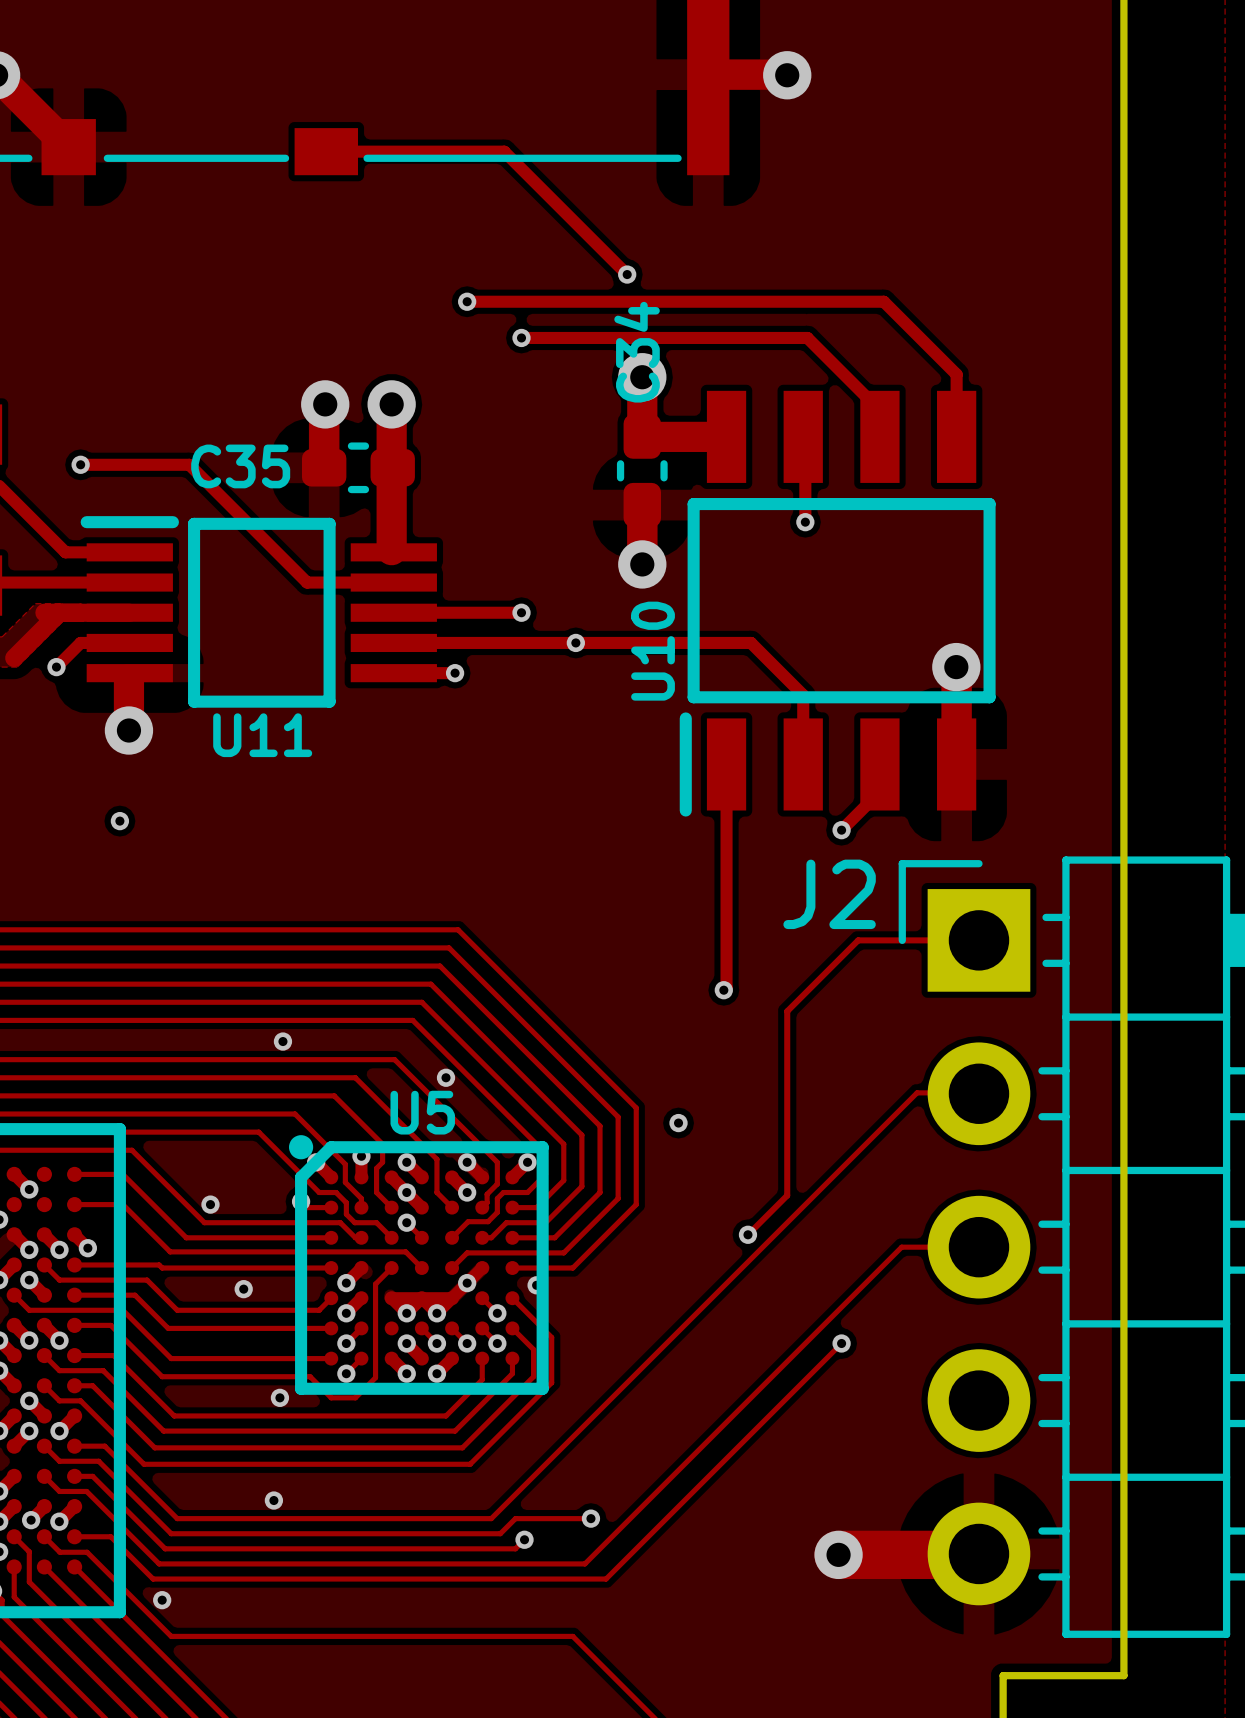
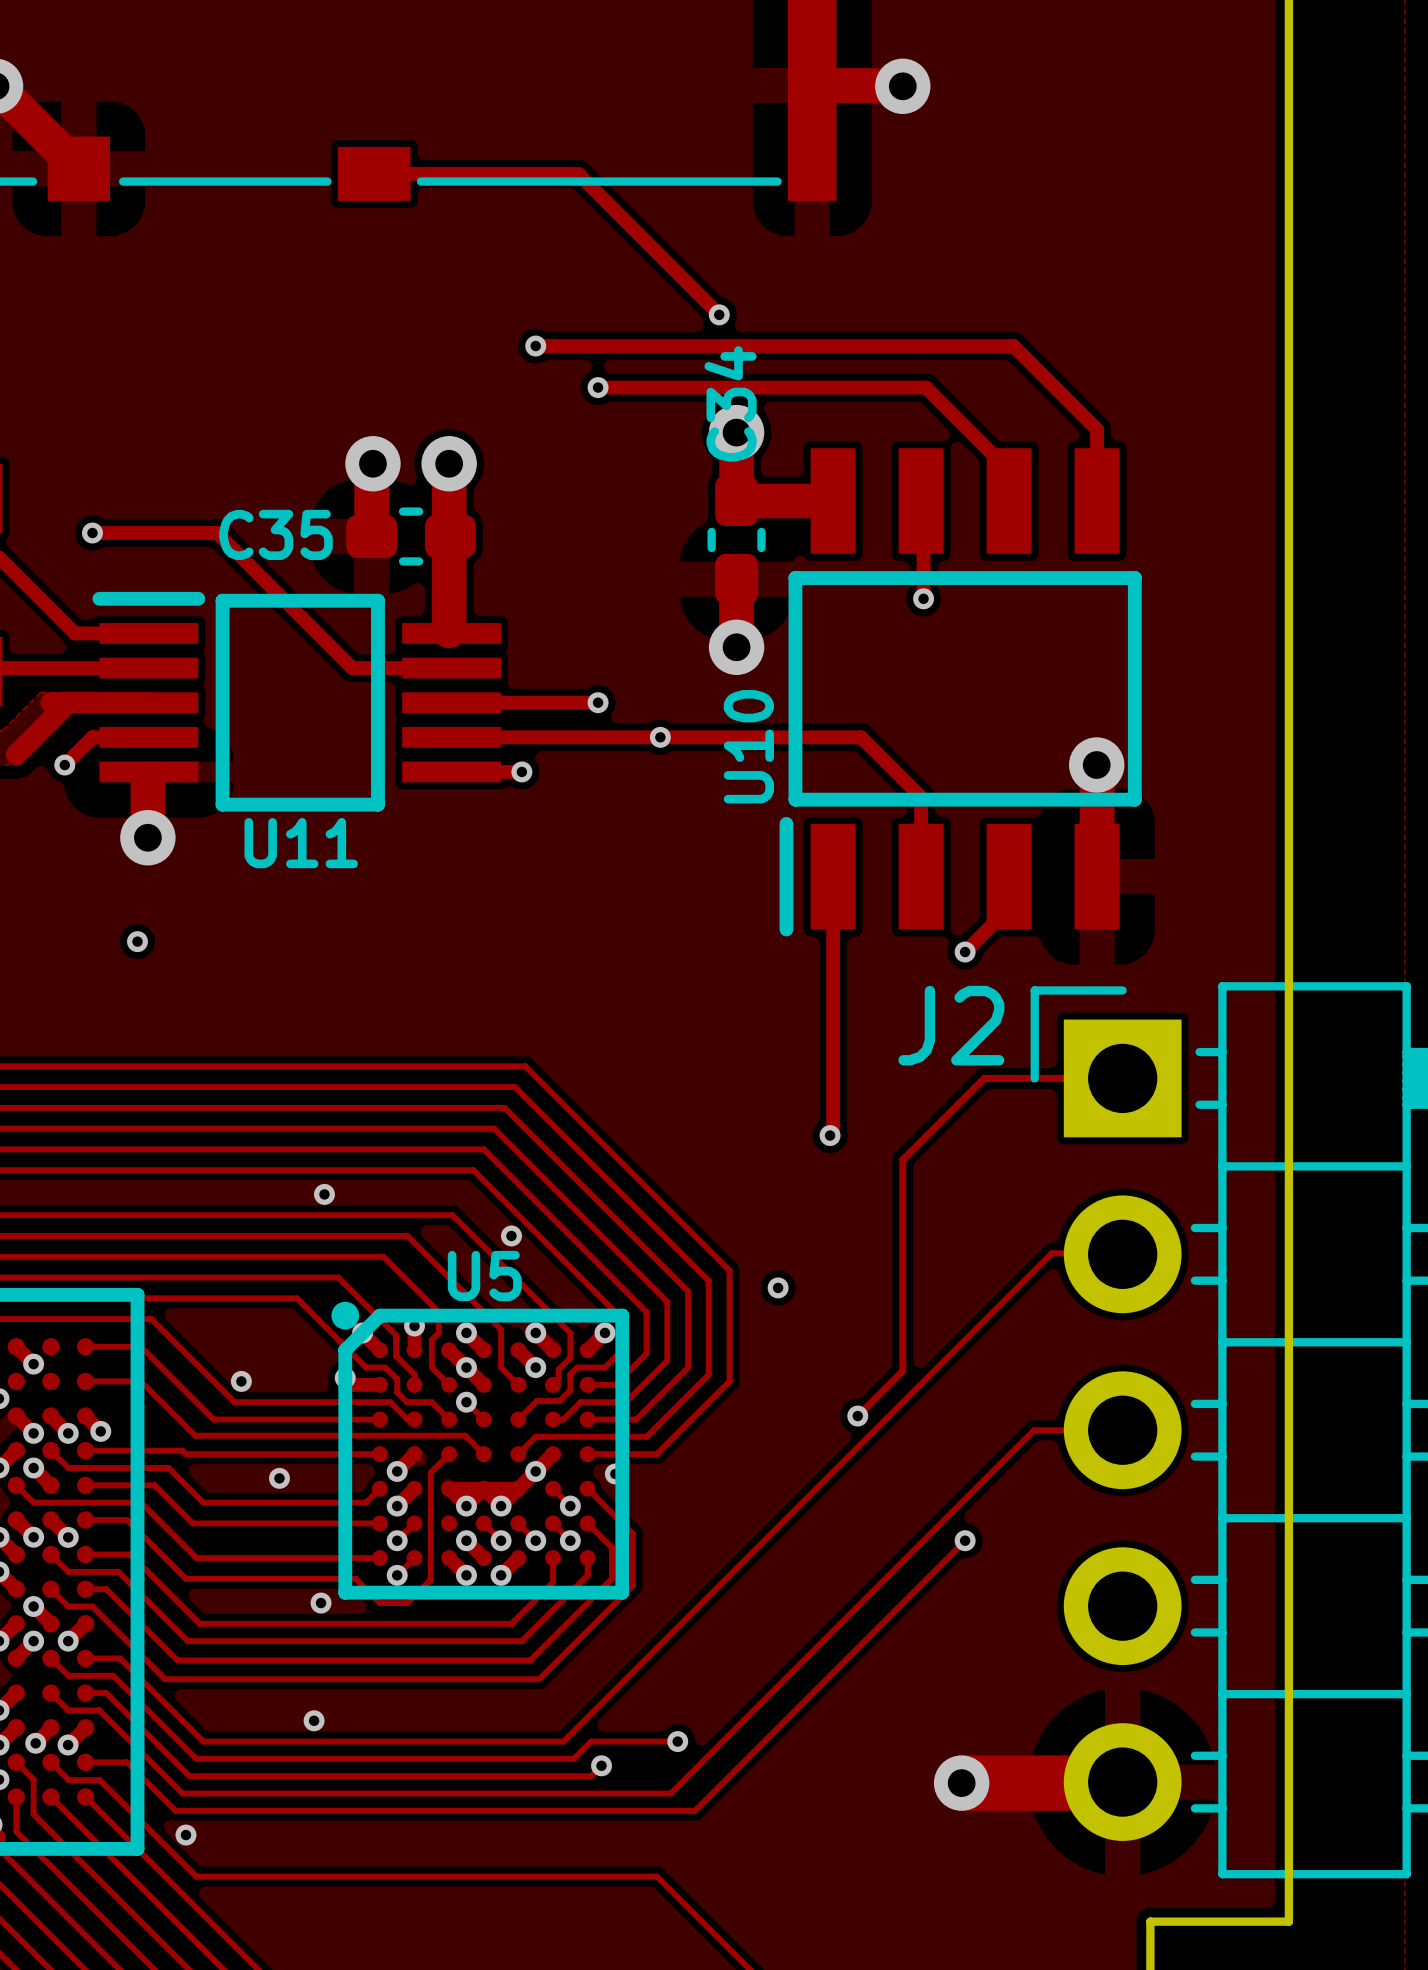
track width: thin (301, 1201) (307, 1207) (331, 1207) -> thick (345, 1377) (352, 1384) (379, 1384)

